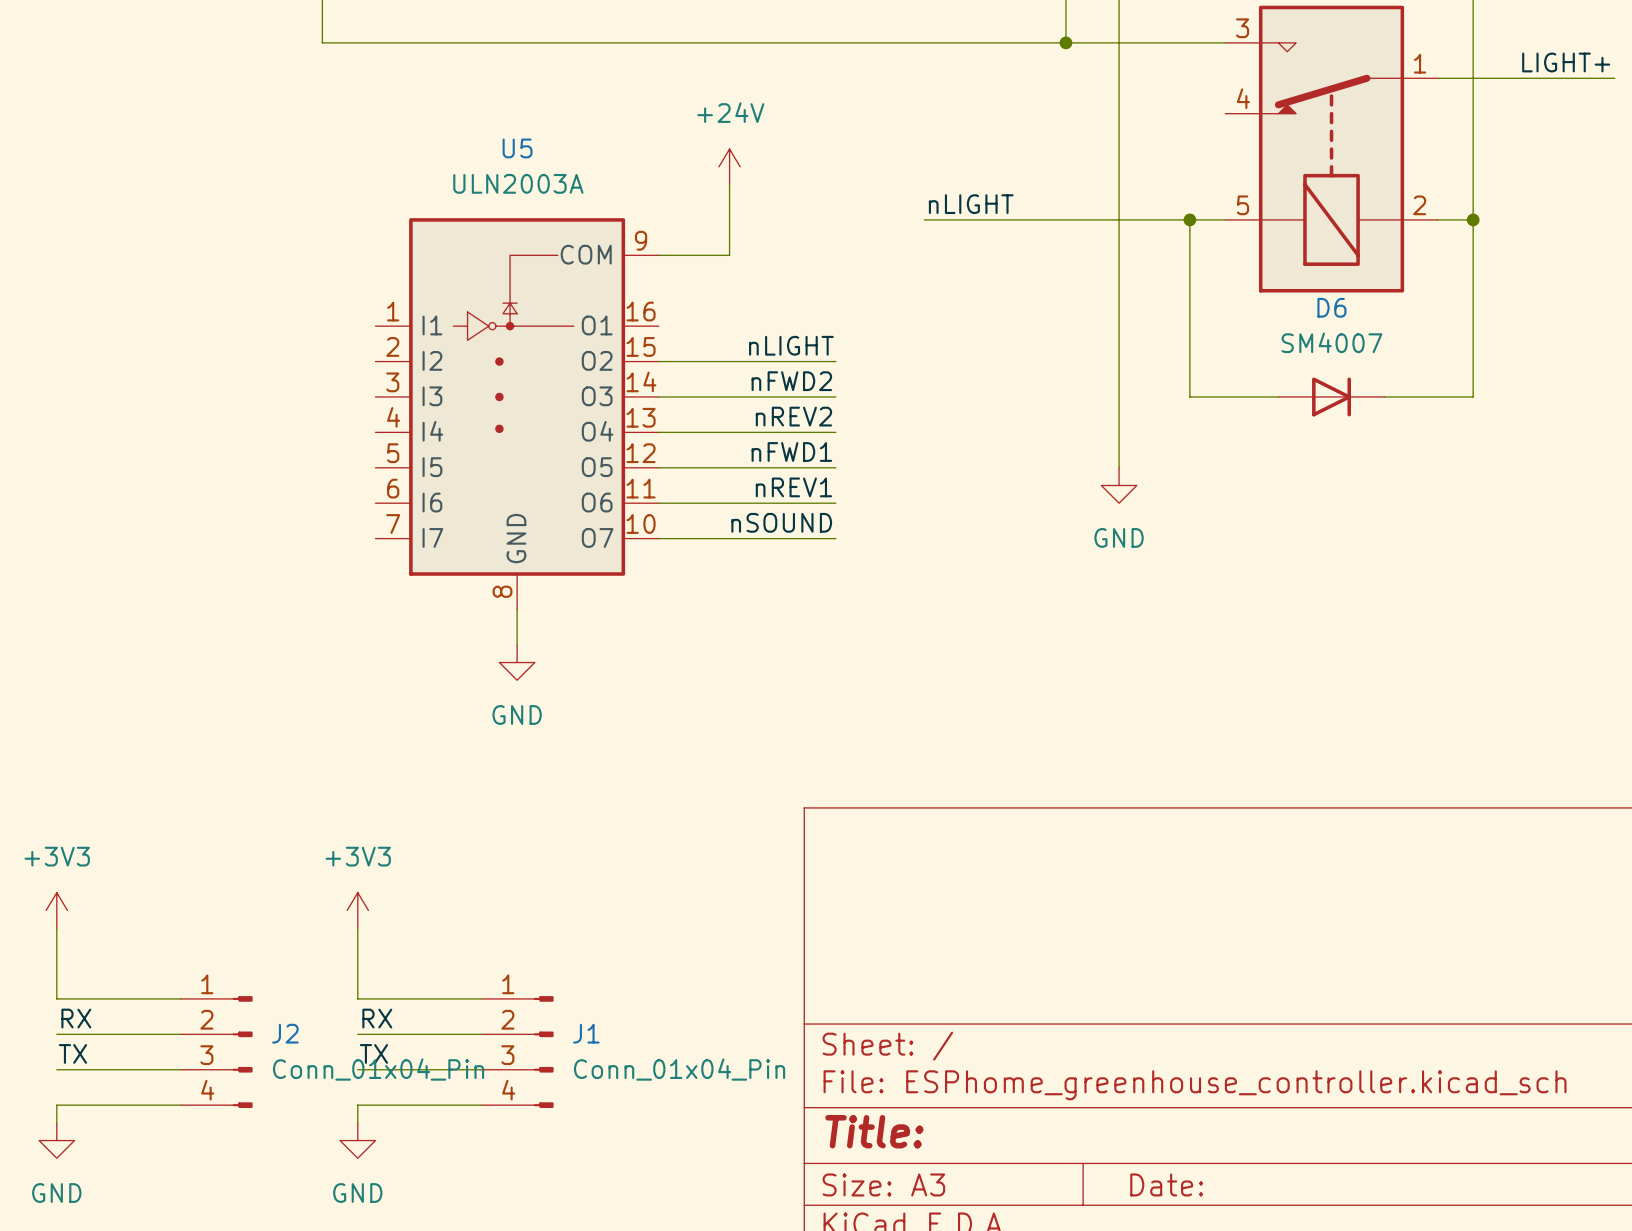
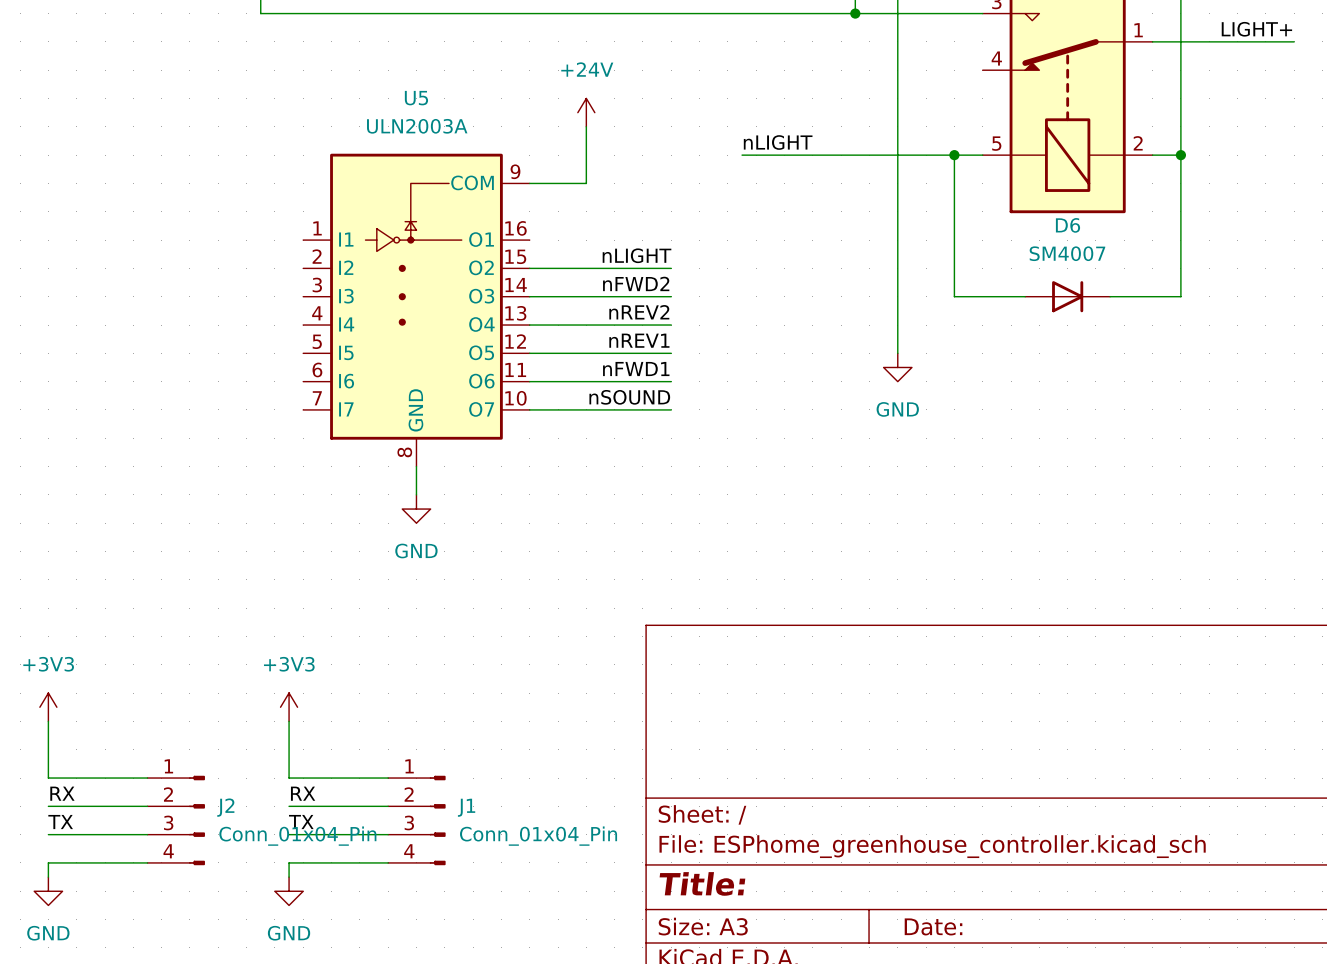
label: nFWD1 (791, 451) -> nREV1 (639, 340)
label: nREV1 (793, 487) -> nFWD1 (636, 369)

